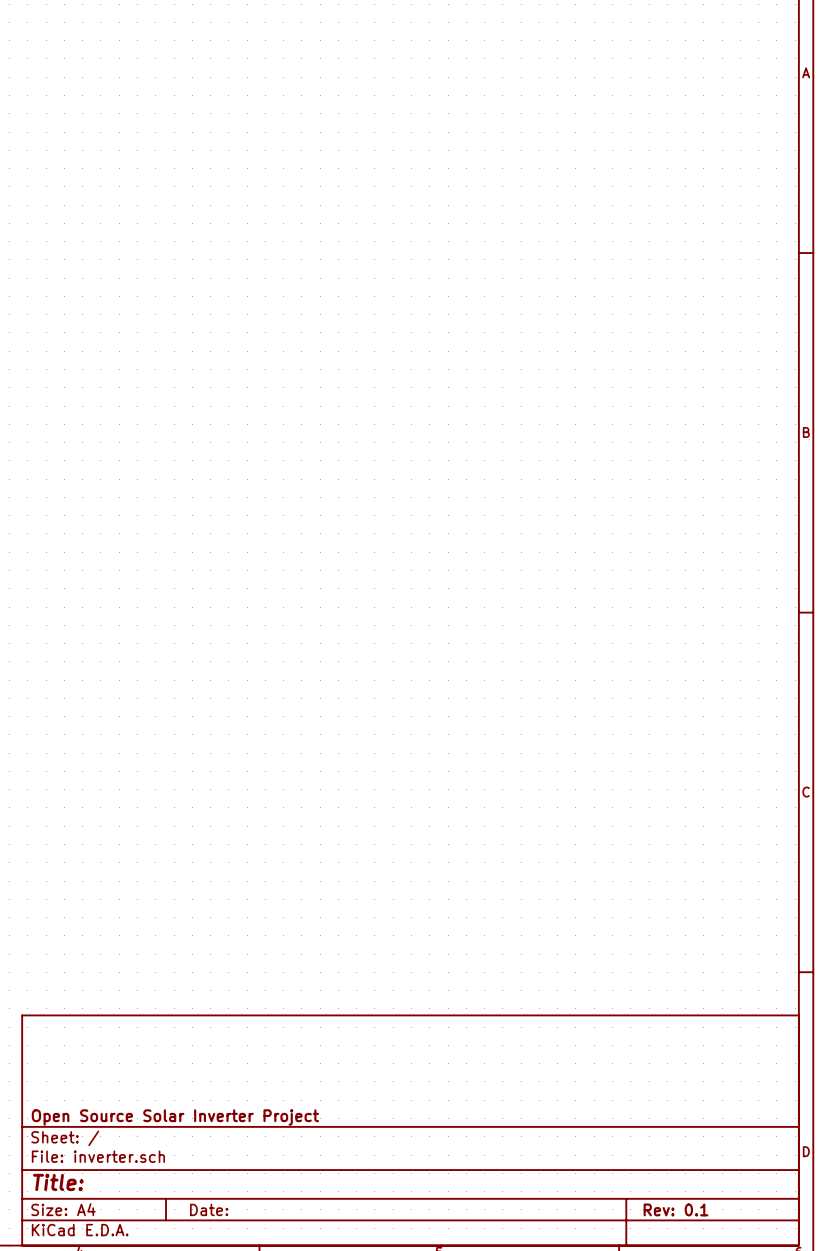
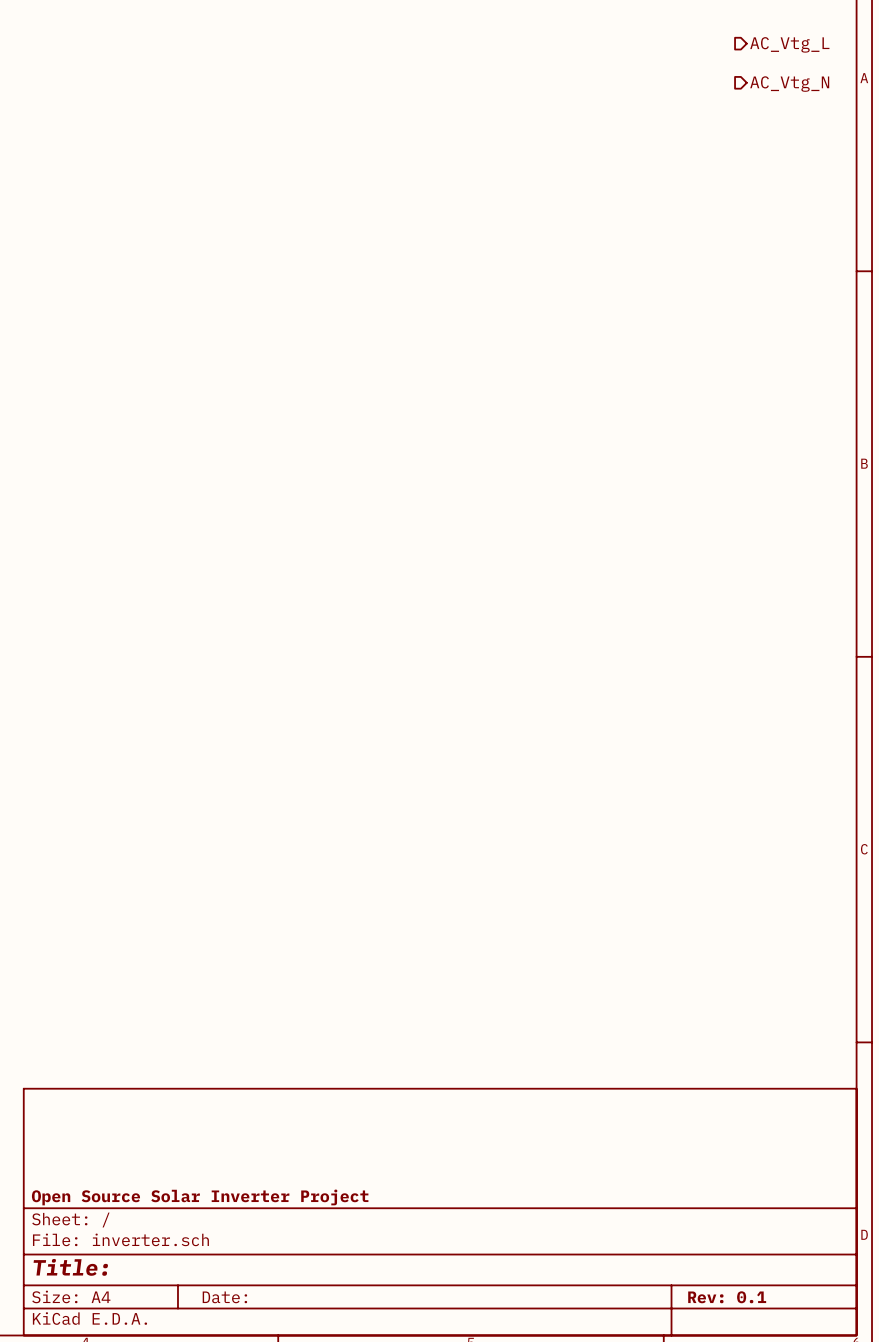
hierarchical label: none -> AC_Vtg_L (789, 44)
hierarchical label: none -> AC_Vtg_N (789, 84)

